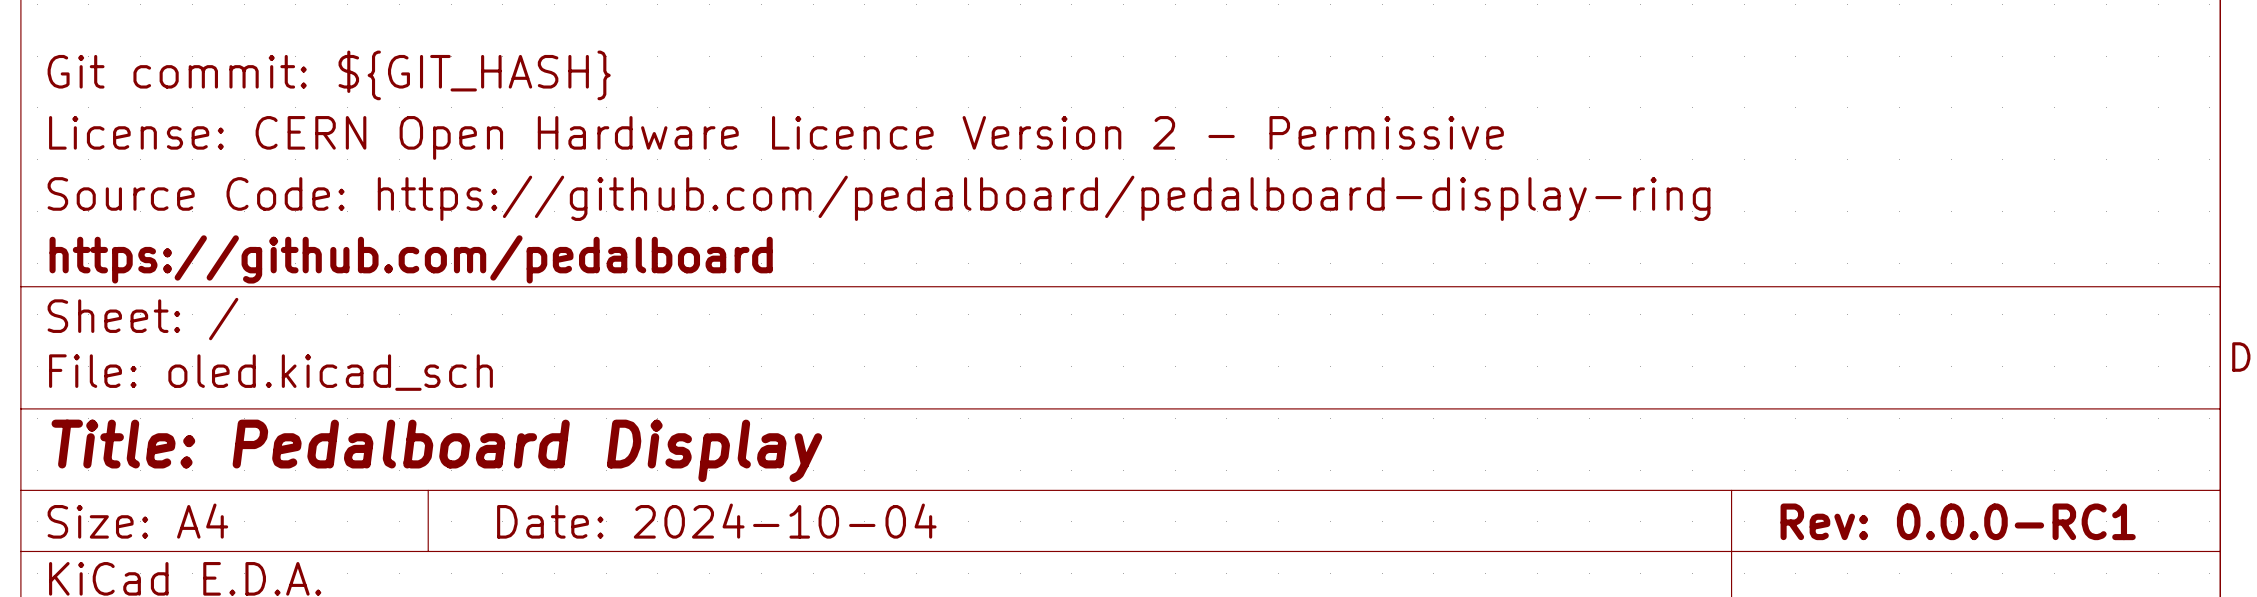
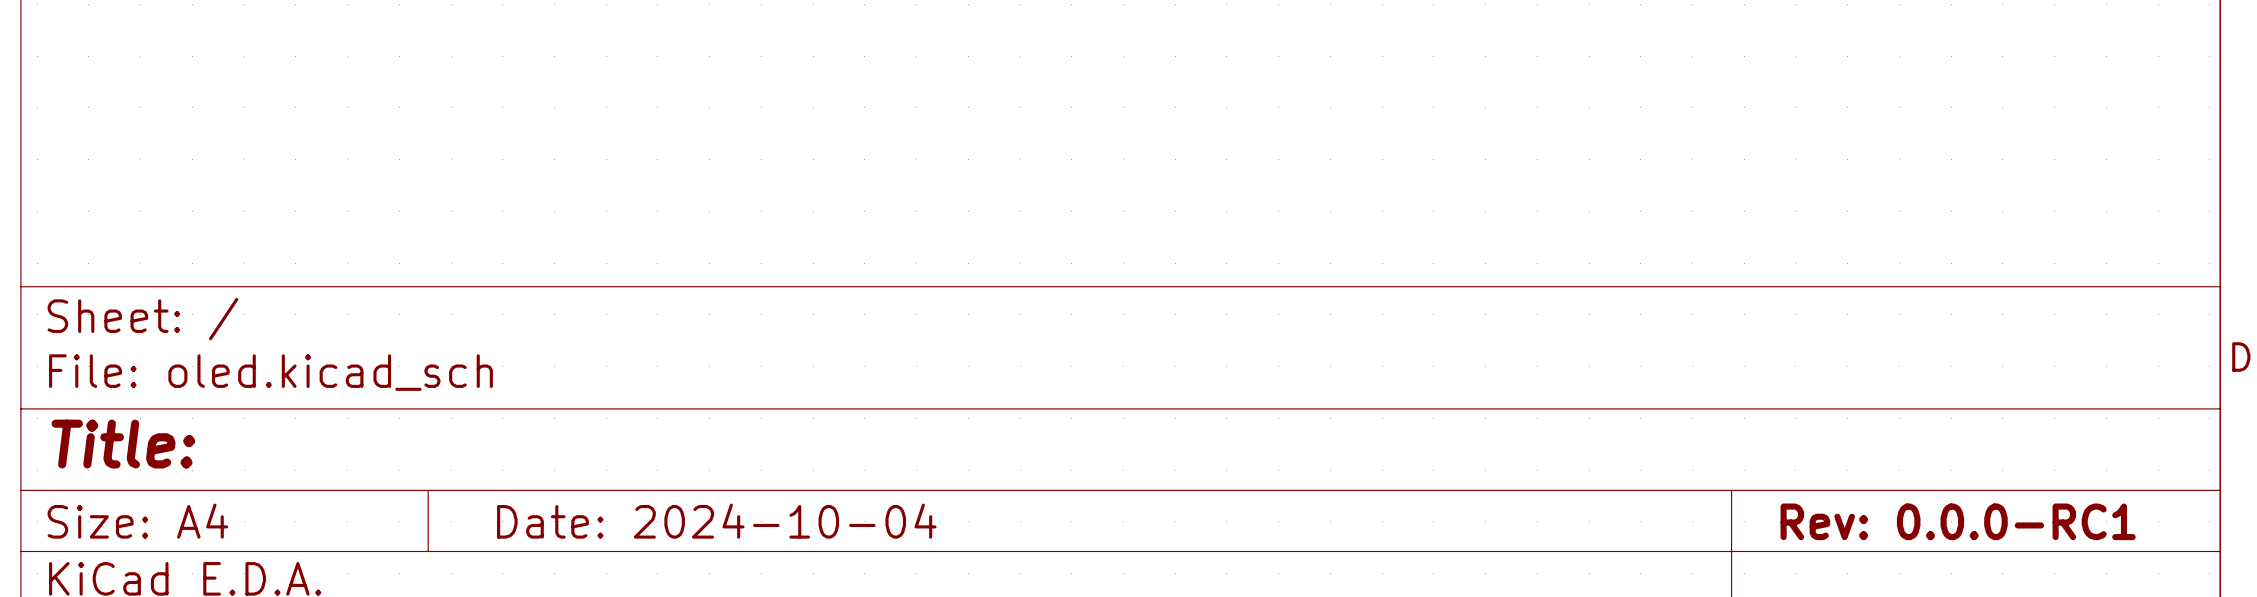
title block: Git commit: ${GIT_HASH} (329, 75) -> none
title block: License: CERN Open Hardware Licence Version 2 - Permissive (776, 137) -> none
title block: Source Code: https://github.com/pedalboard/pedalboard-display-ring (879, 198) -> none
title block: https://github.com/pedalboard (411, 259) -> none
title block: Title: Pedalboard Display (436, 450) -> Title: (123, 444)

